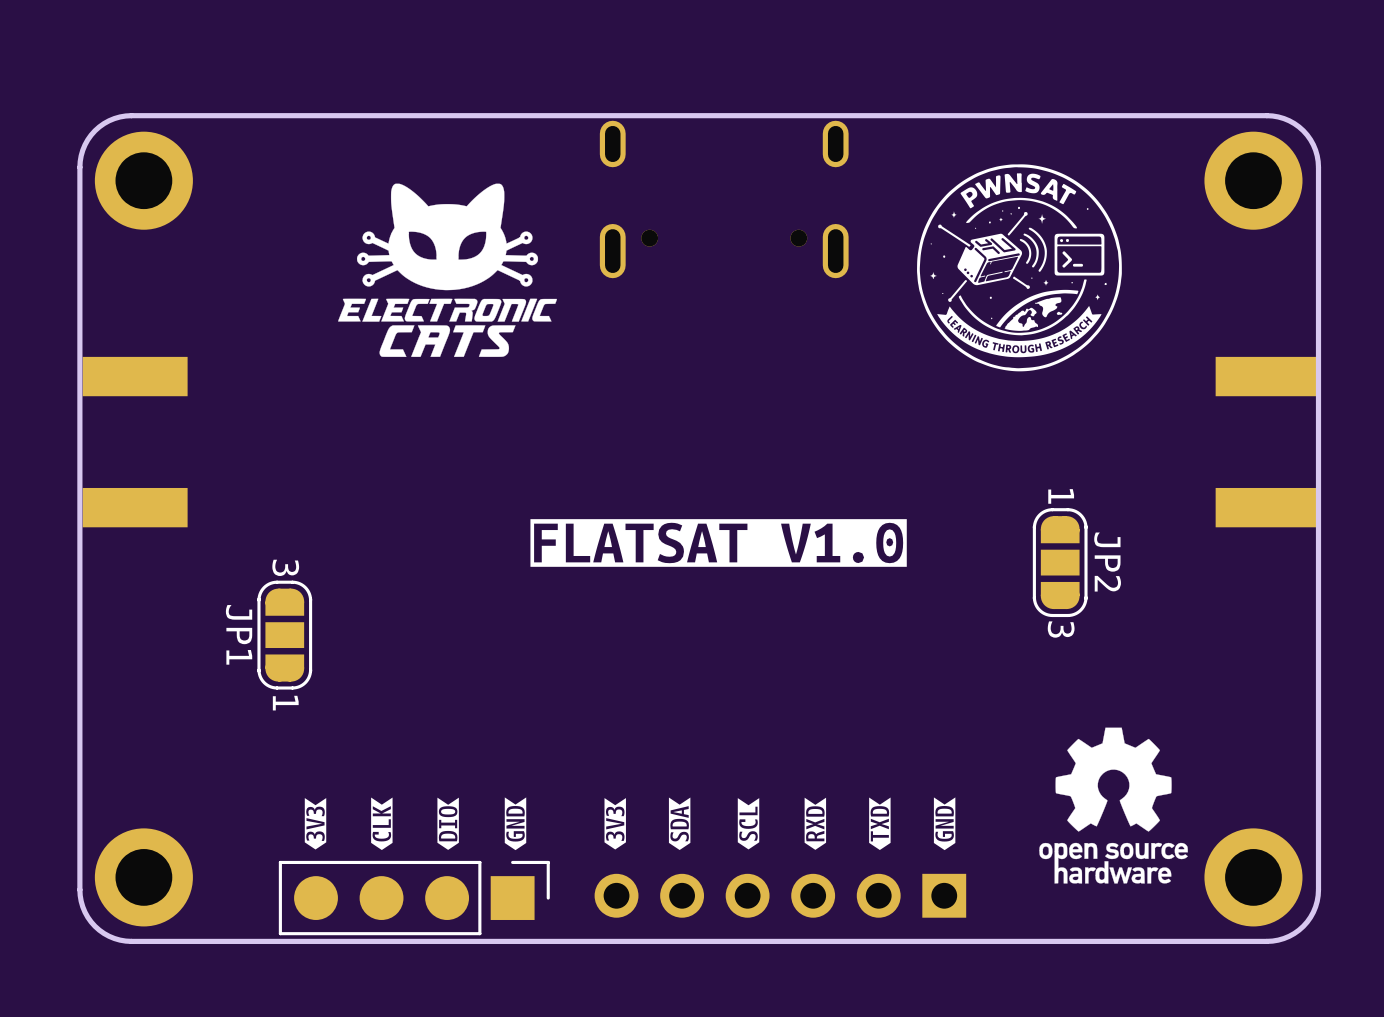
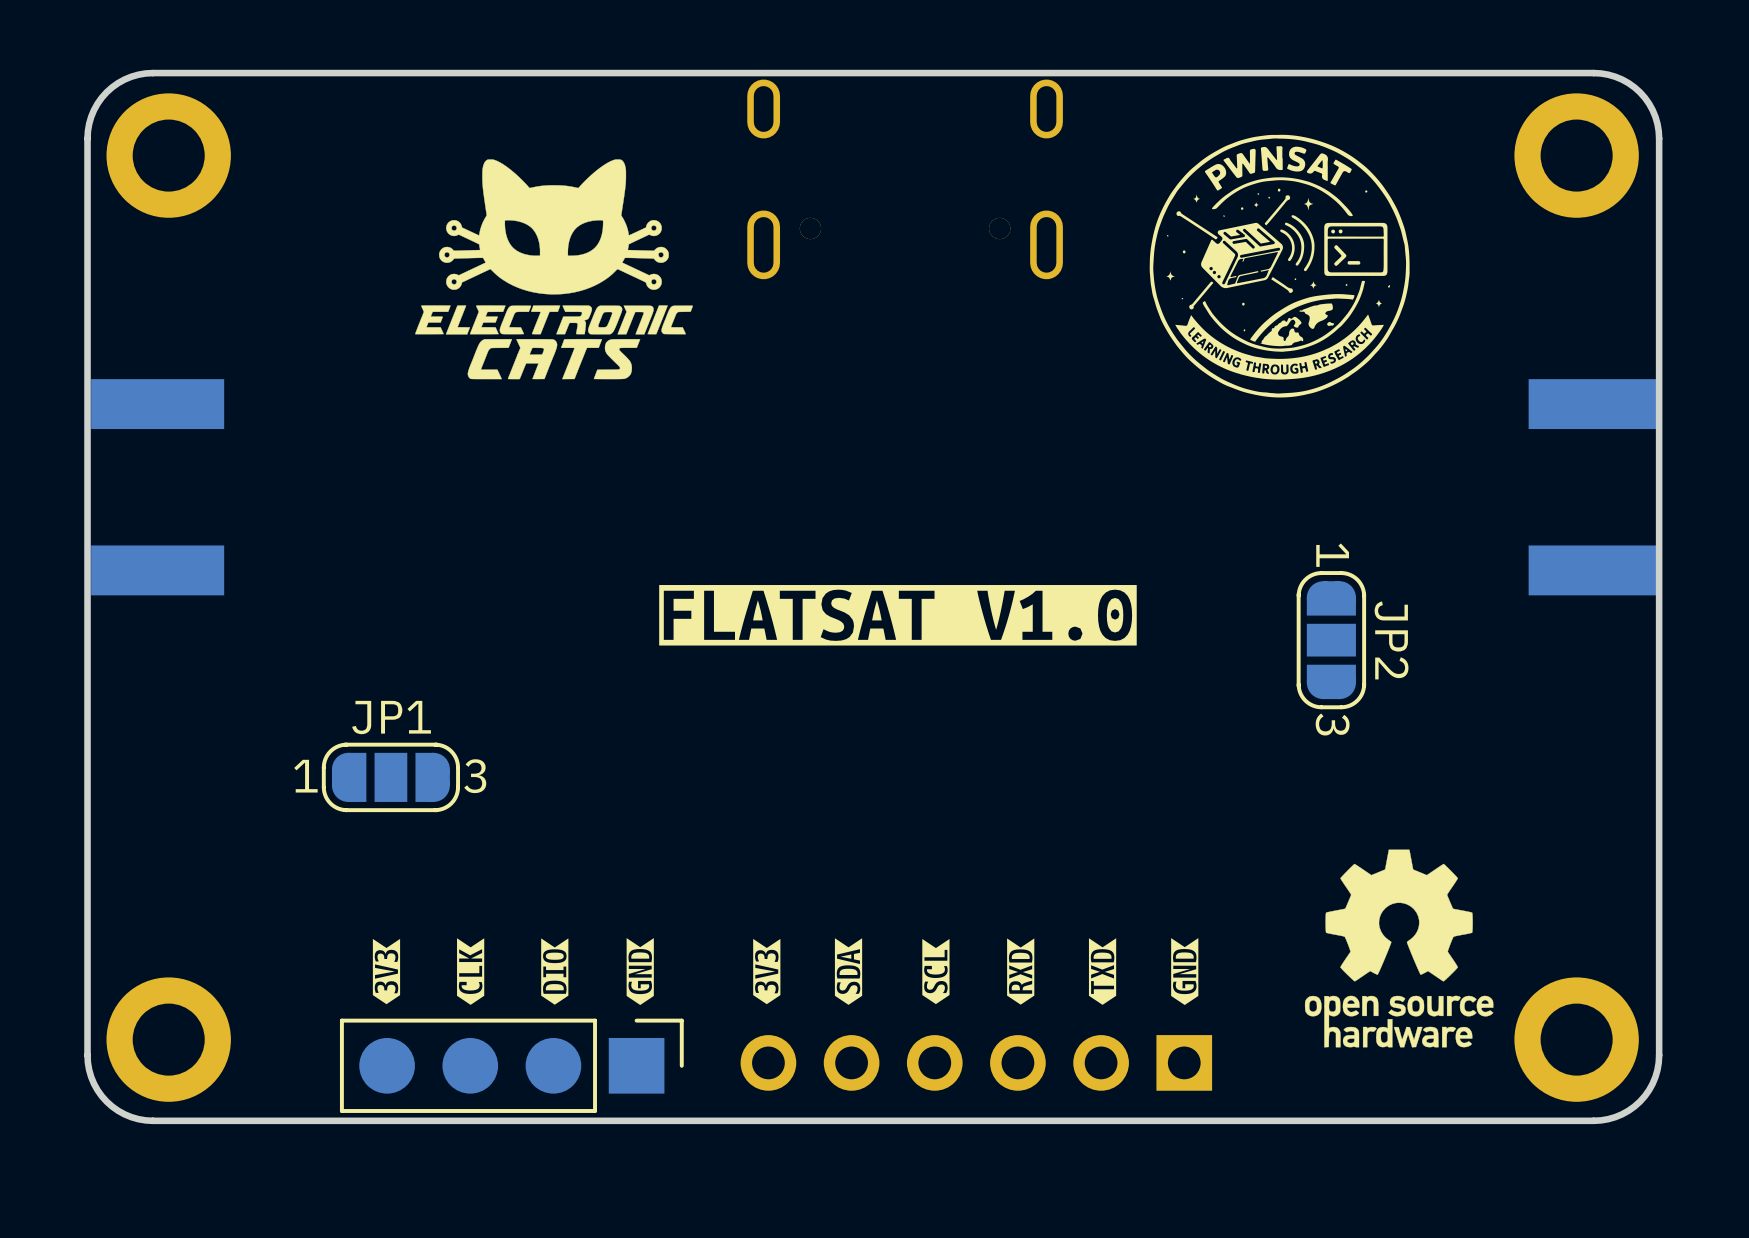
JP1 rotation: 0° (284, 635) -> 90° clockwise (390, 777)

